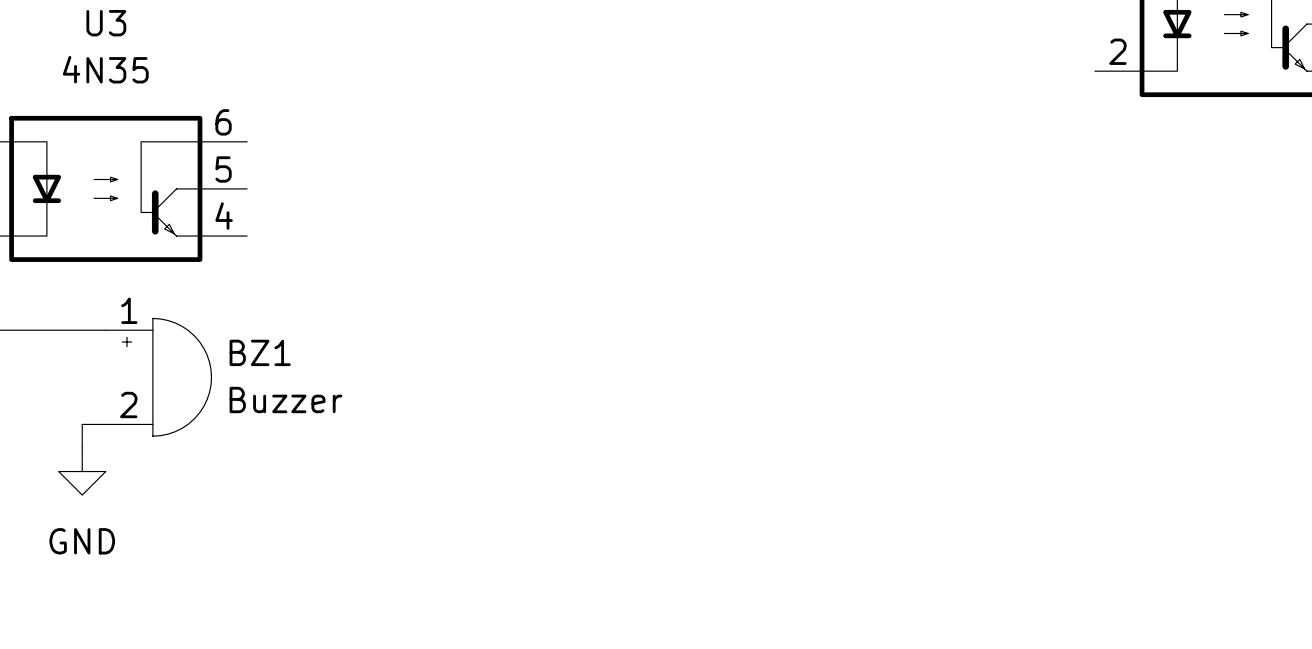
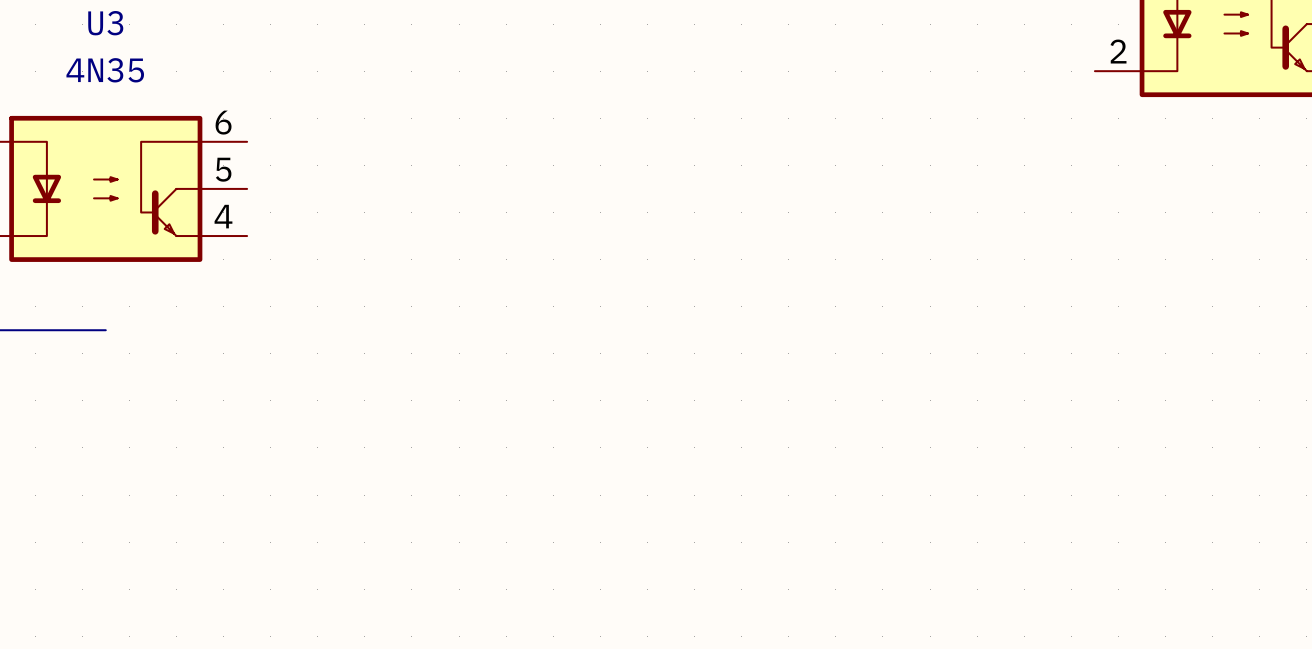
BZ1: Buzzer (158, 377) -> none
wire: (105, 424) (82, 424) (82, 447) -> none
power symbol: GND (82, 471) -> none

